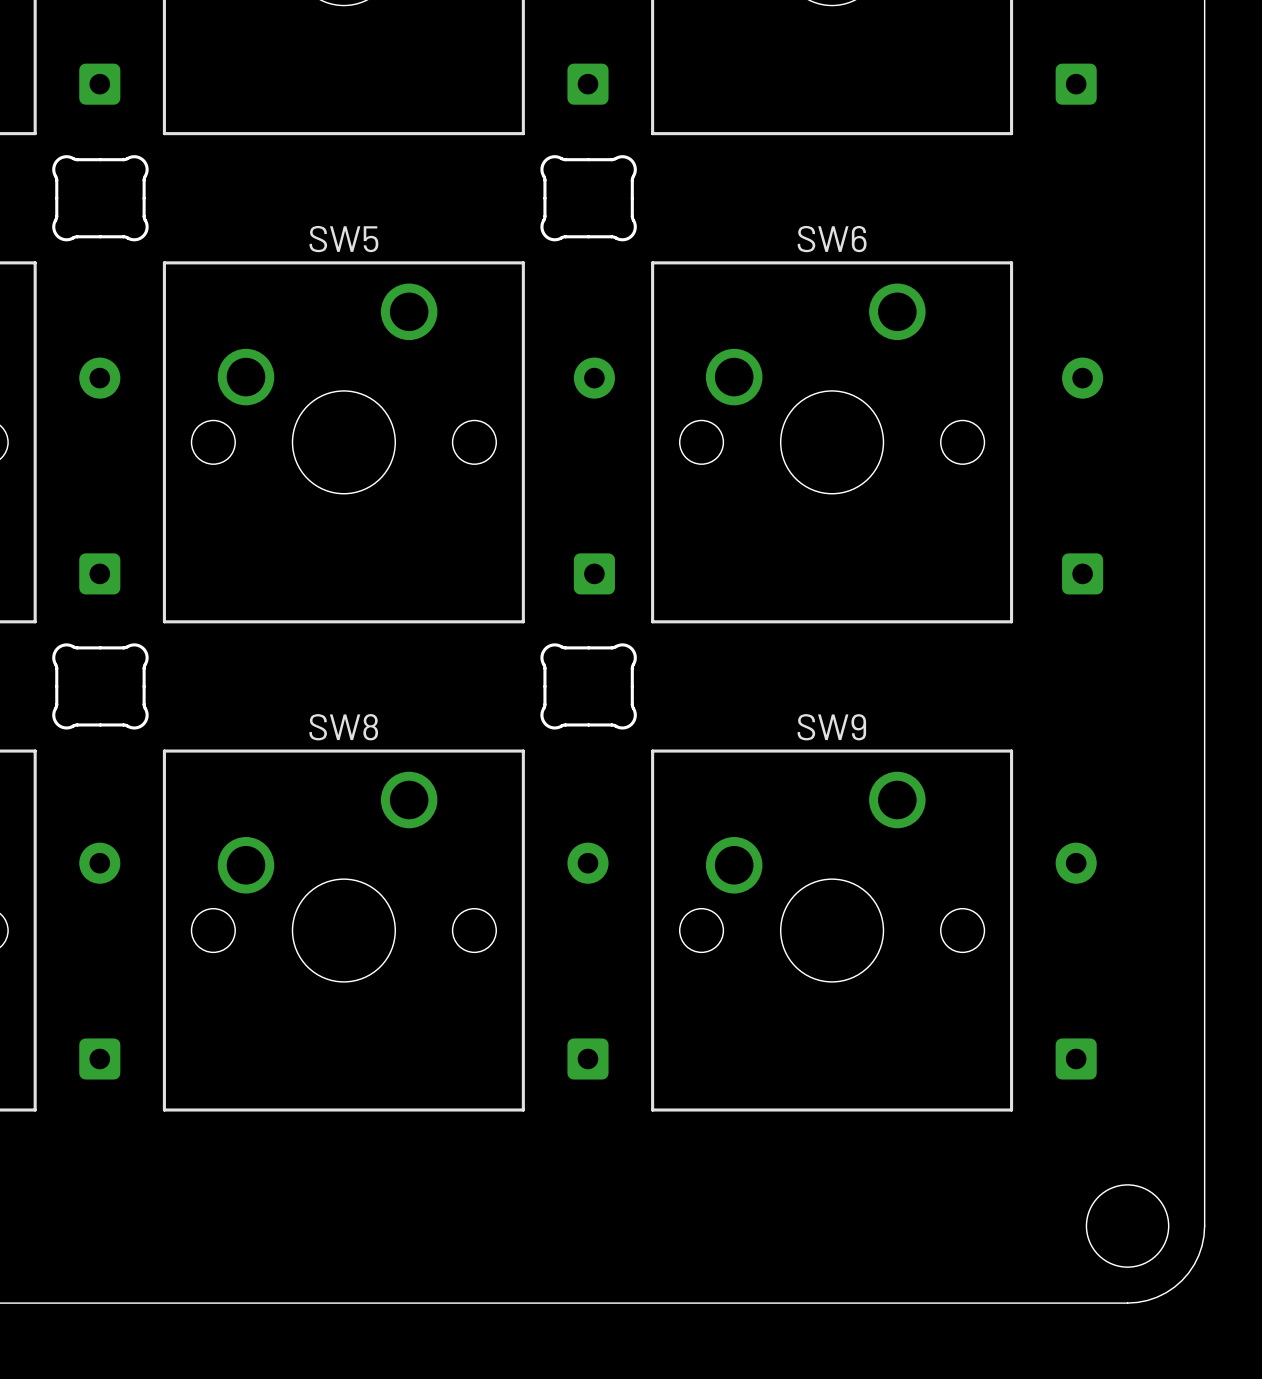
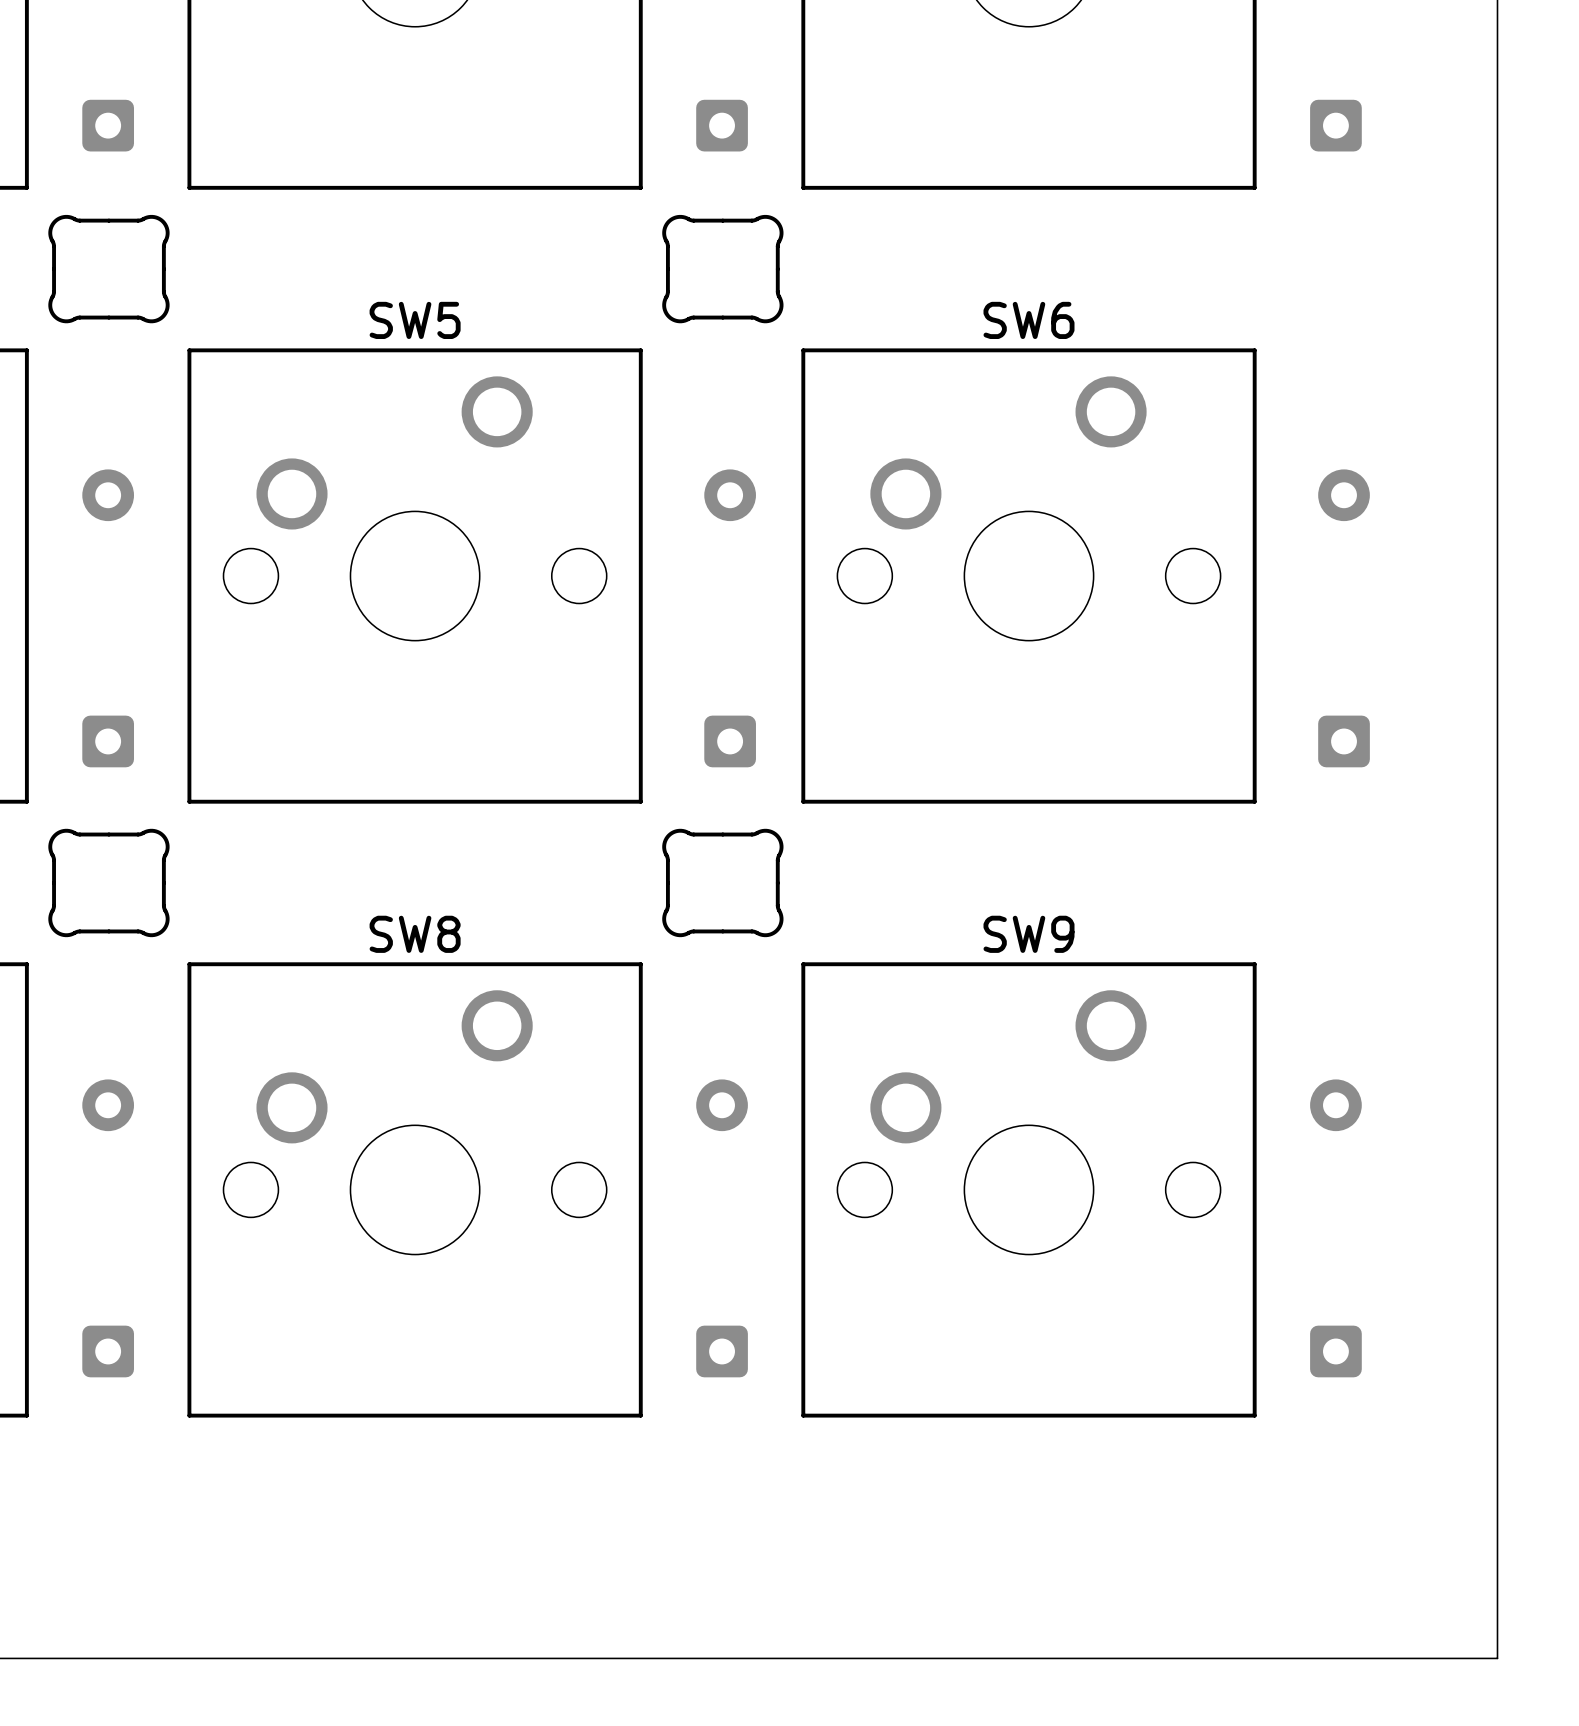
round board edge: [1085, 1184, 1170, 1268] -> none
board edge: (1204, 1226) (1198, 1255) (1182, 1280) (1157, 1297) (1127, 1303) -> (1497, 1561) (1497, 1658) (1400, 1658)

